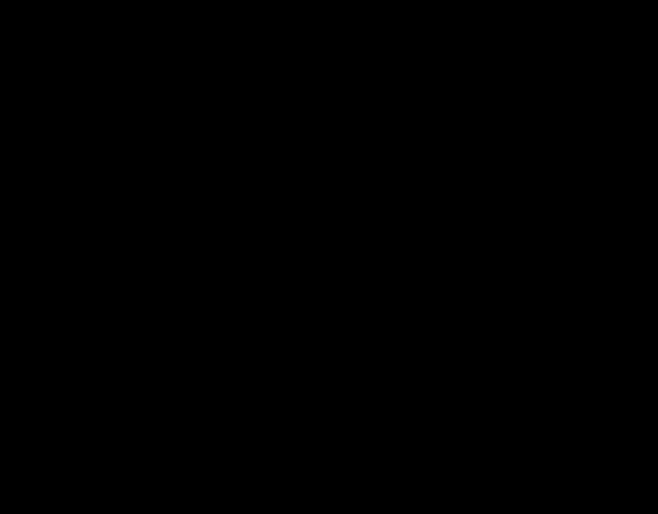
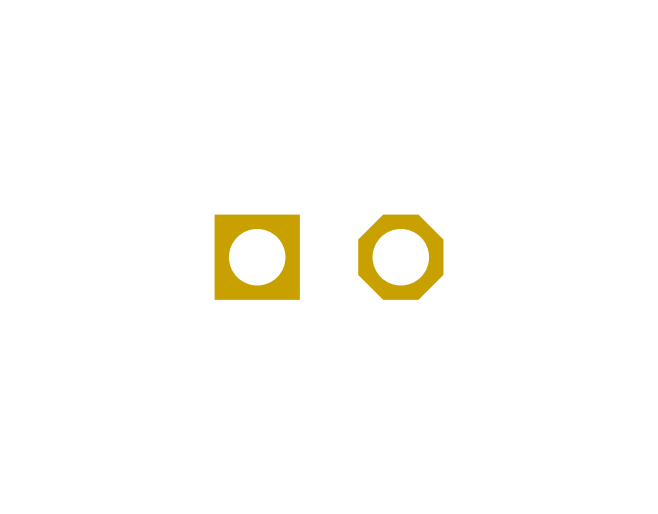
part: none -> (329, 257)

